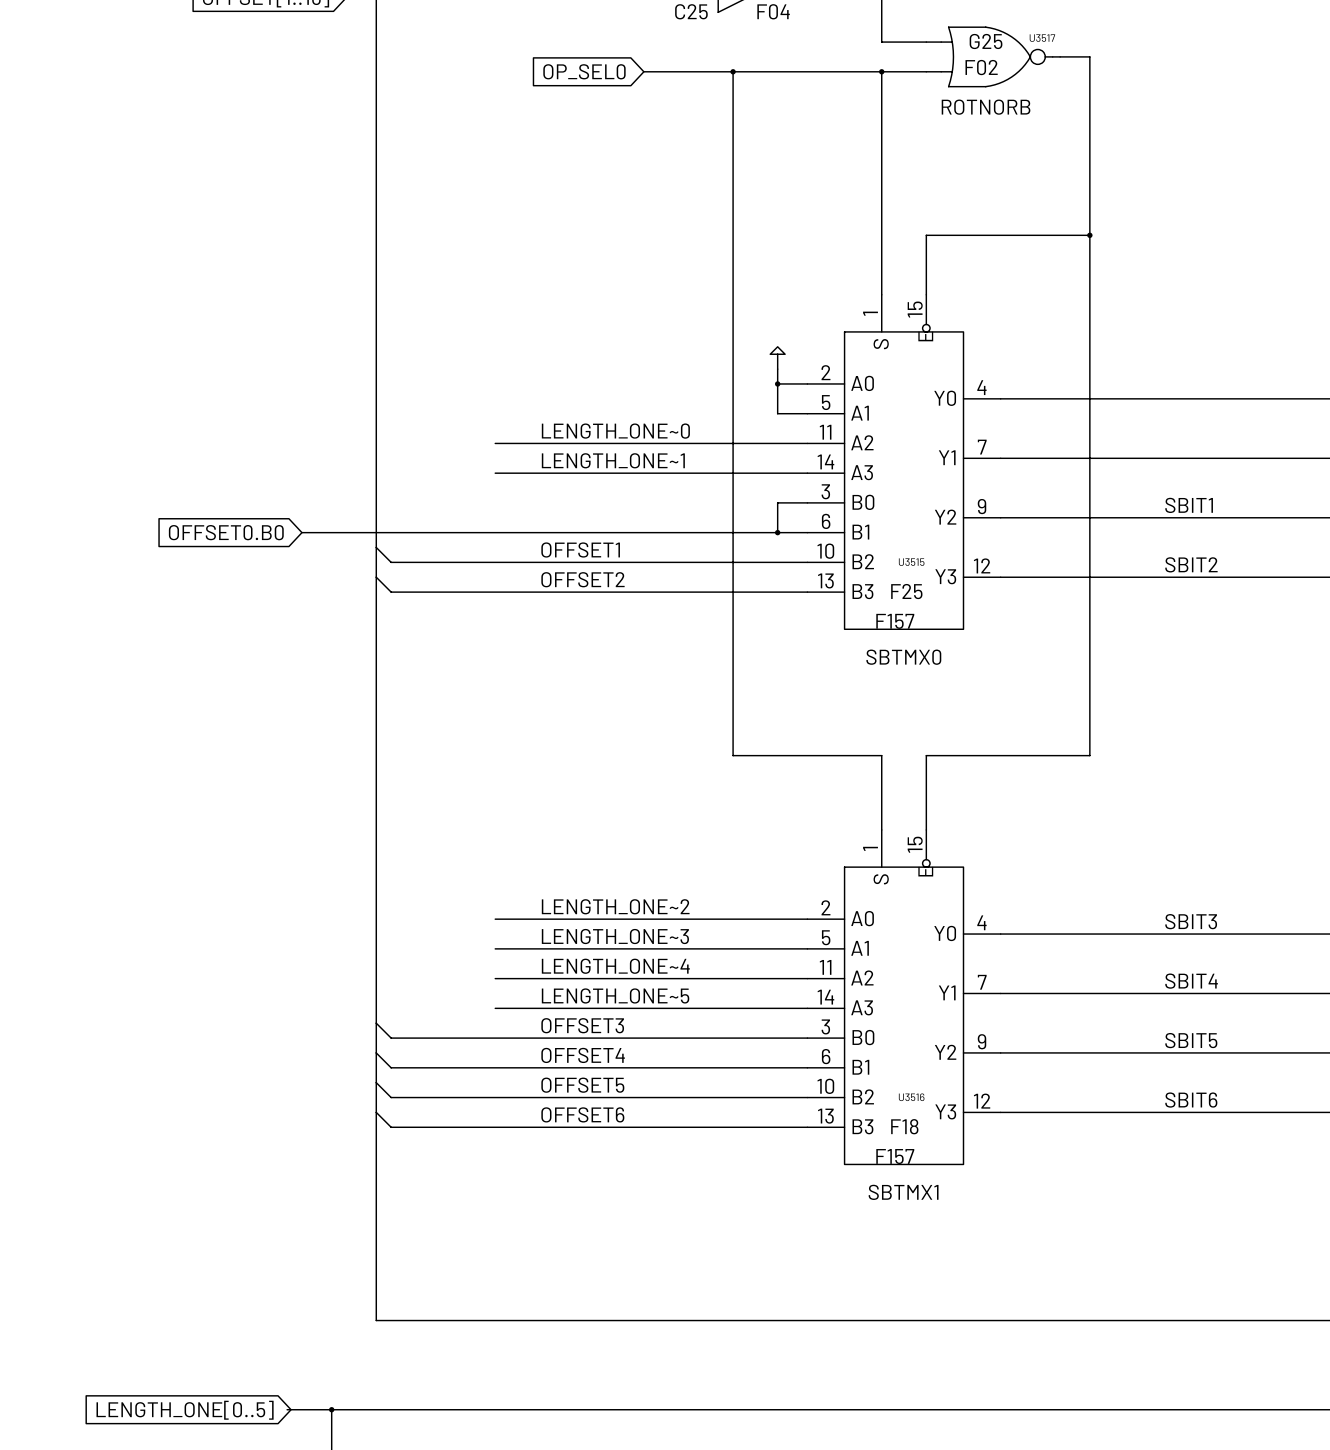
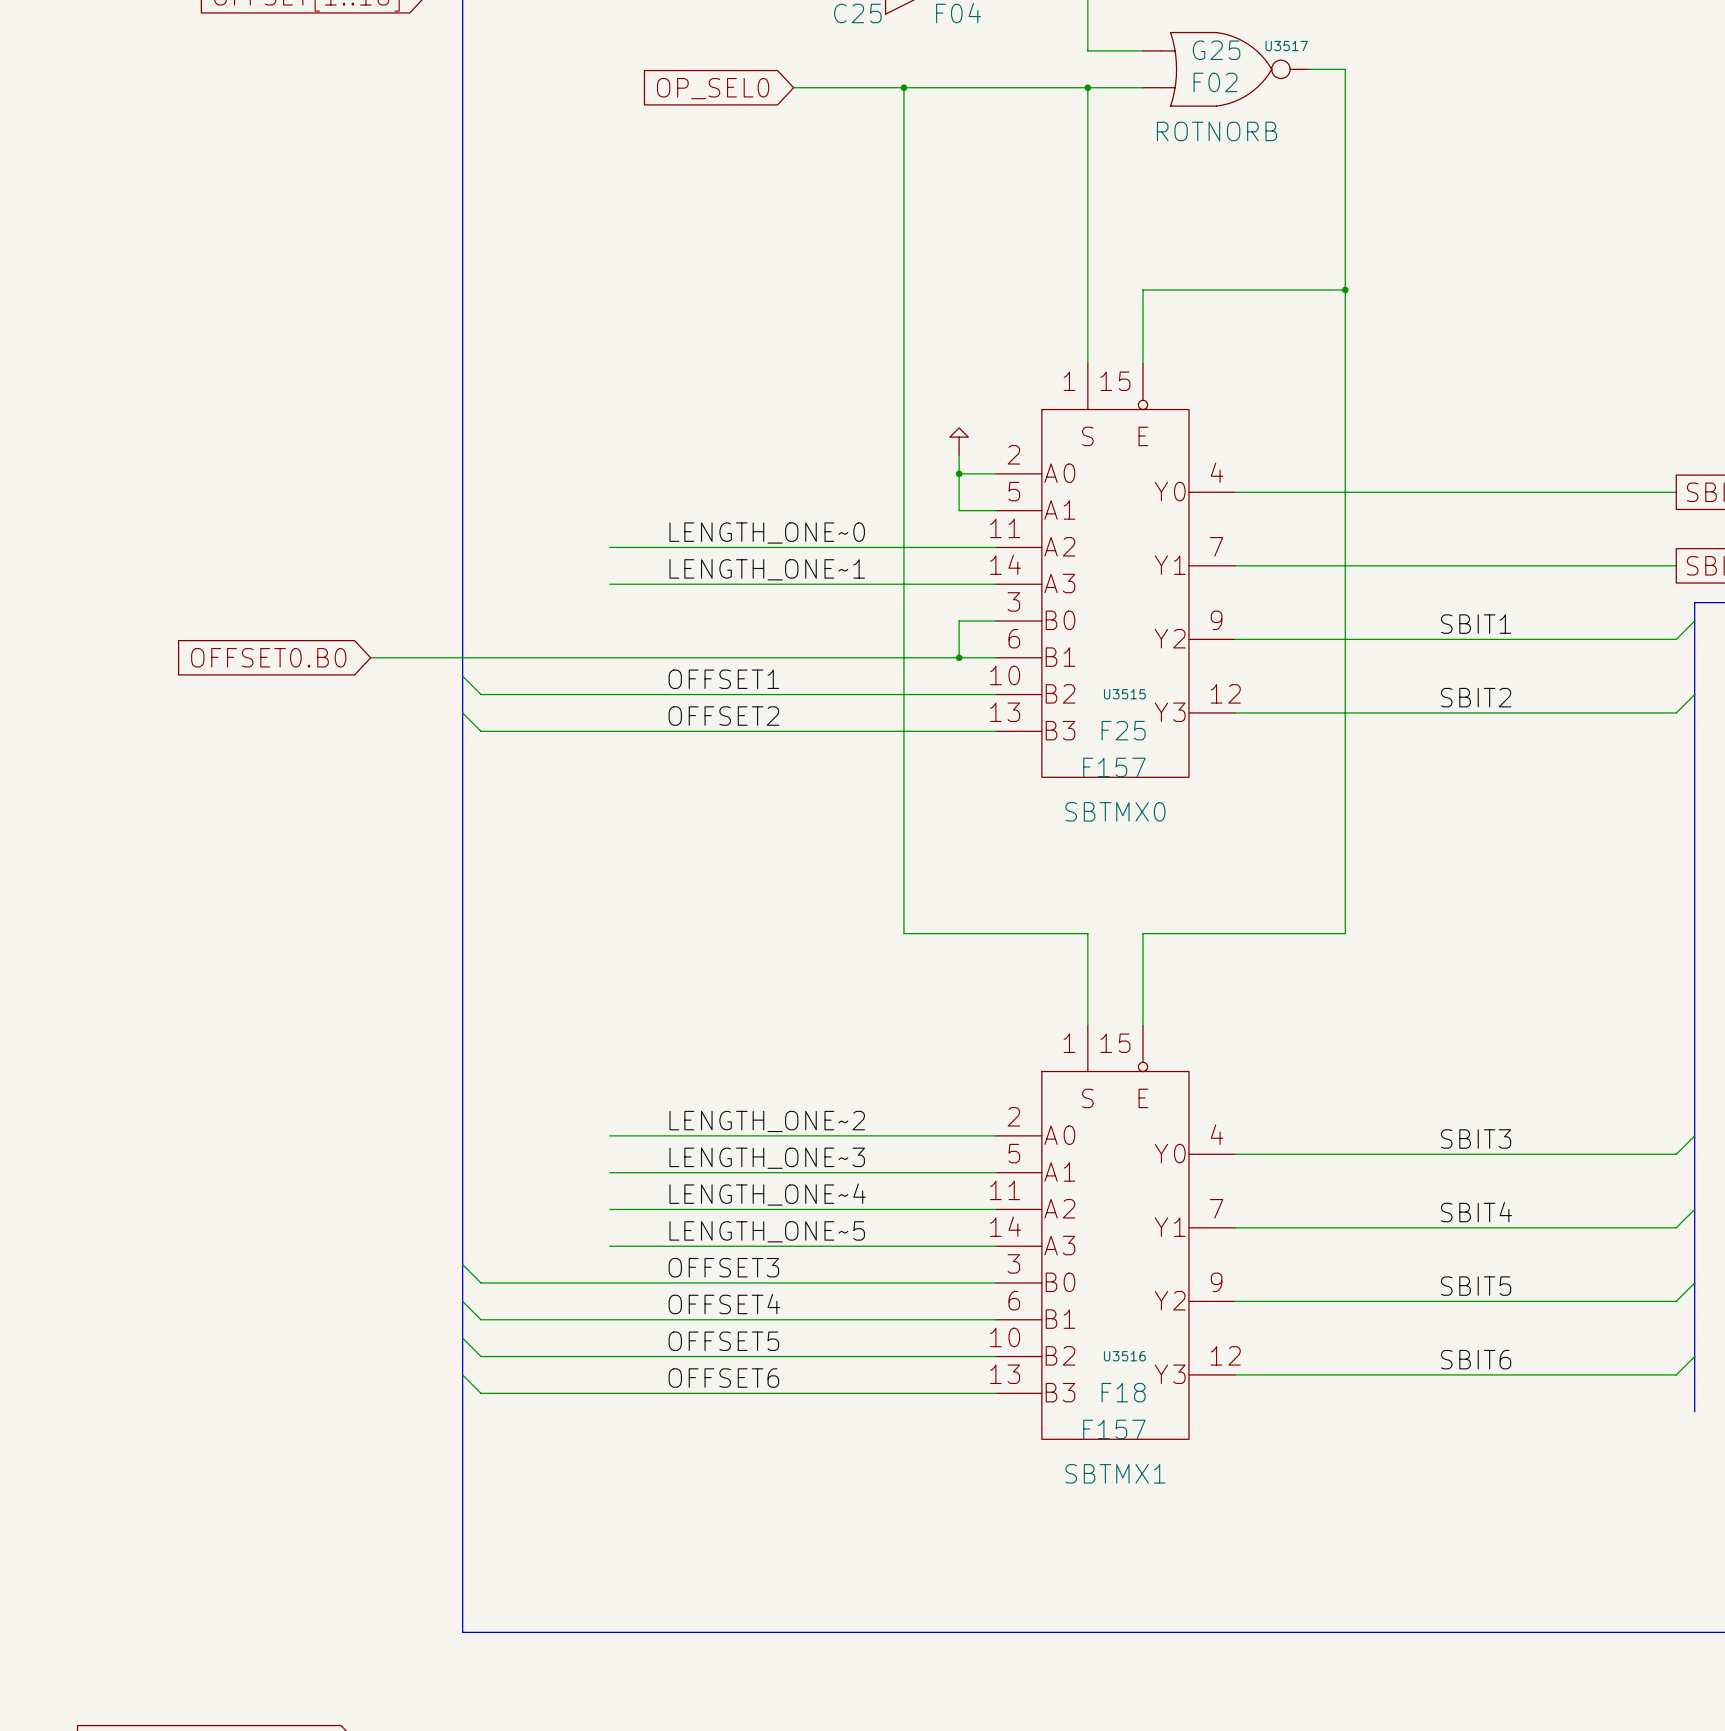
U3515 symbol: [807, 294, 1001, 630] -> [995, 363, 1235, 778]
U3516 symbol: [807, 829, 1001, 1165] -> [995, 1025, 1235, 1440]

